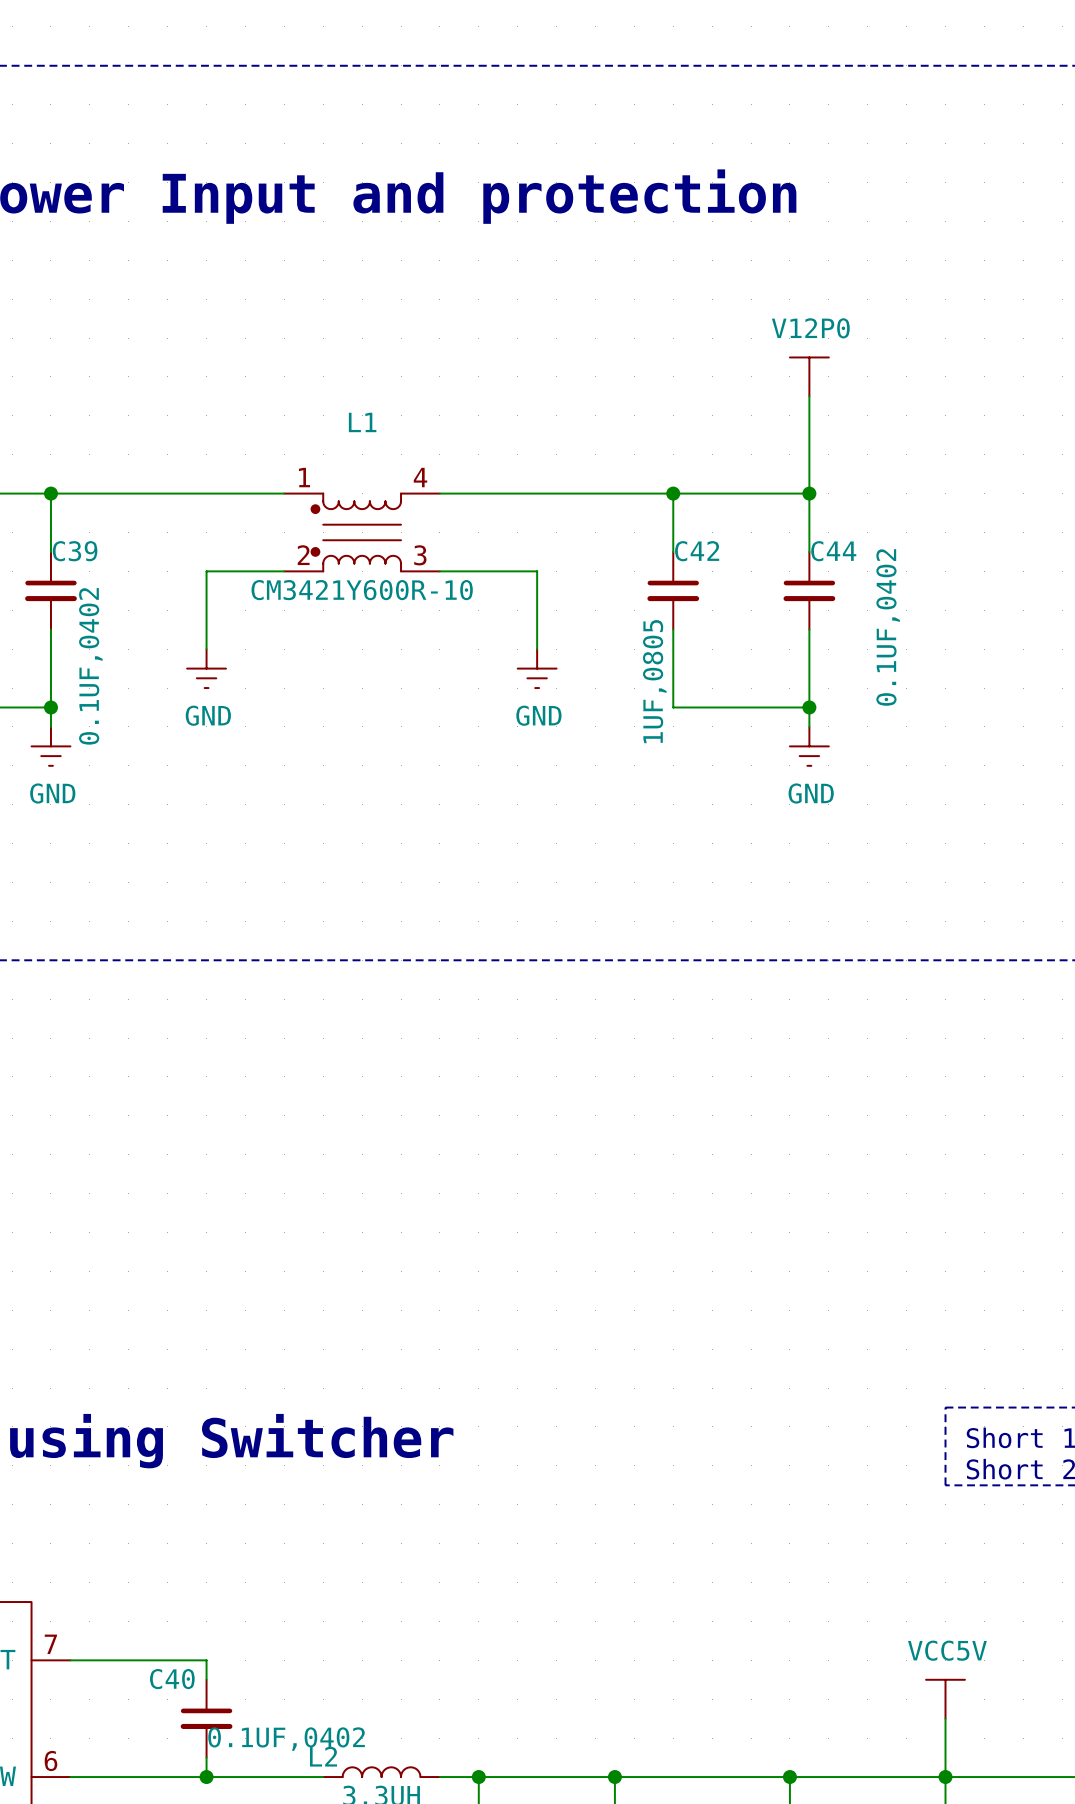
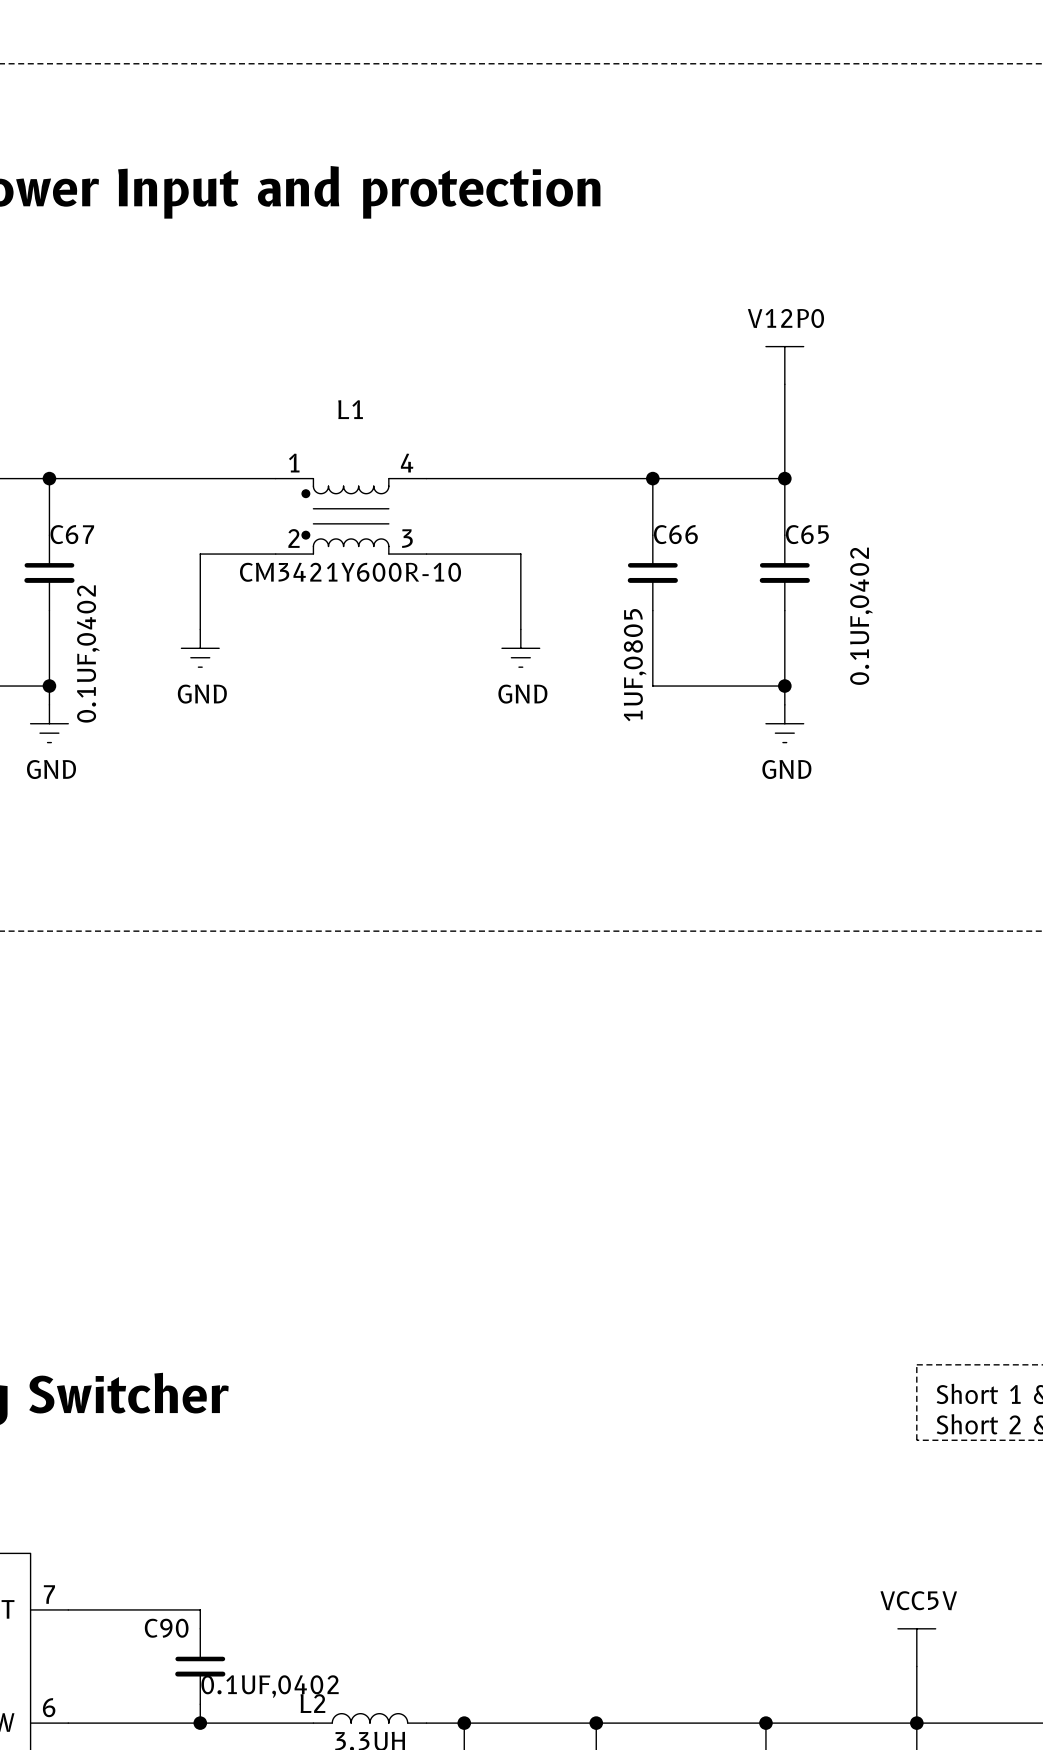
C39 name: C39 (75, 551) -> C67 (72, 534)
C42 name: C42 (697, 551) -> C66 (675, 534)
C44 name: C44 (833, 551) -> C65 (807, 534)
C40 name: C40 (172, 1679) -> C90 (166, 1628)

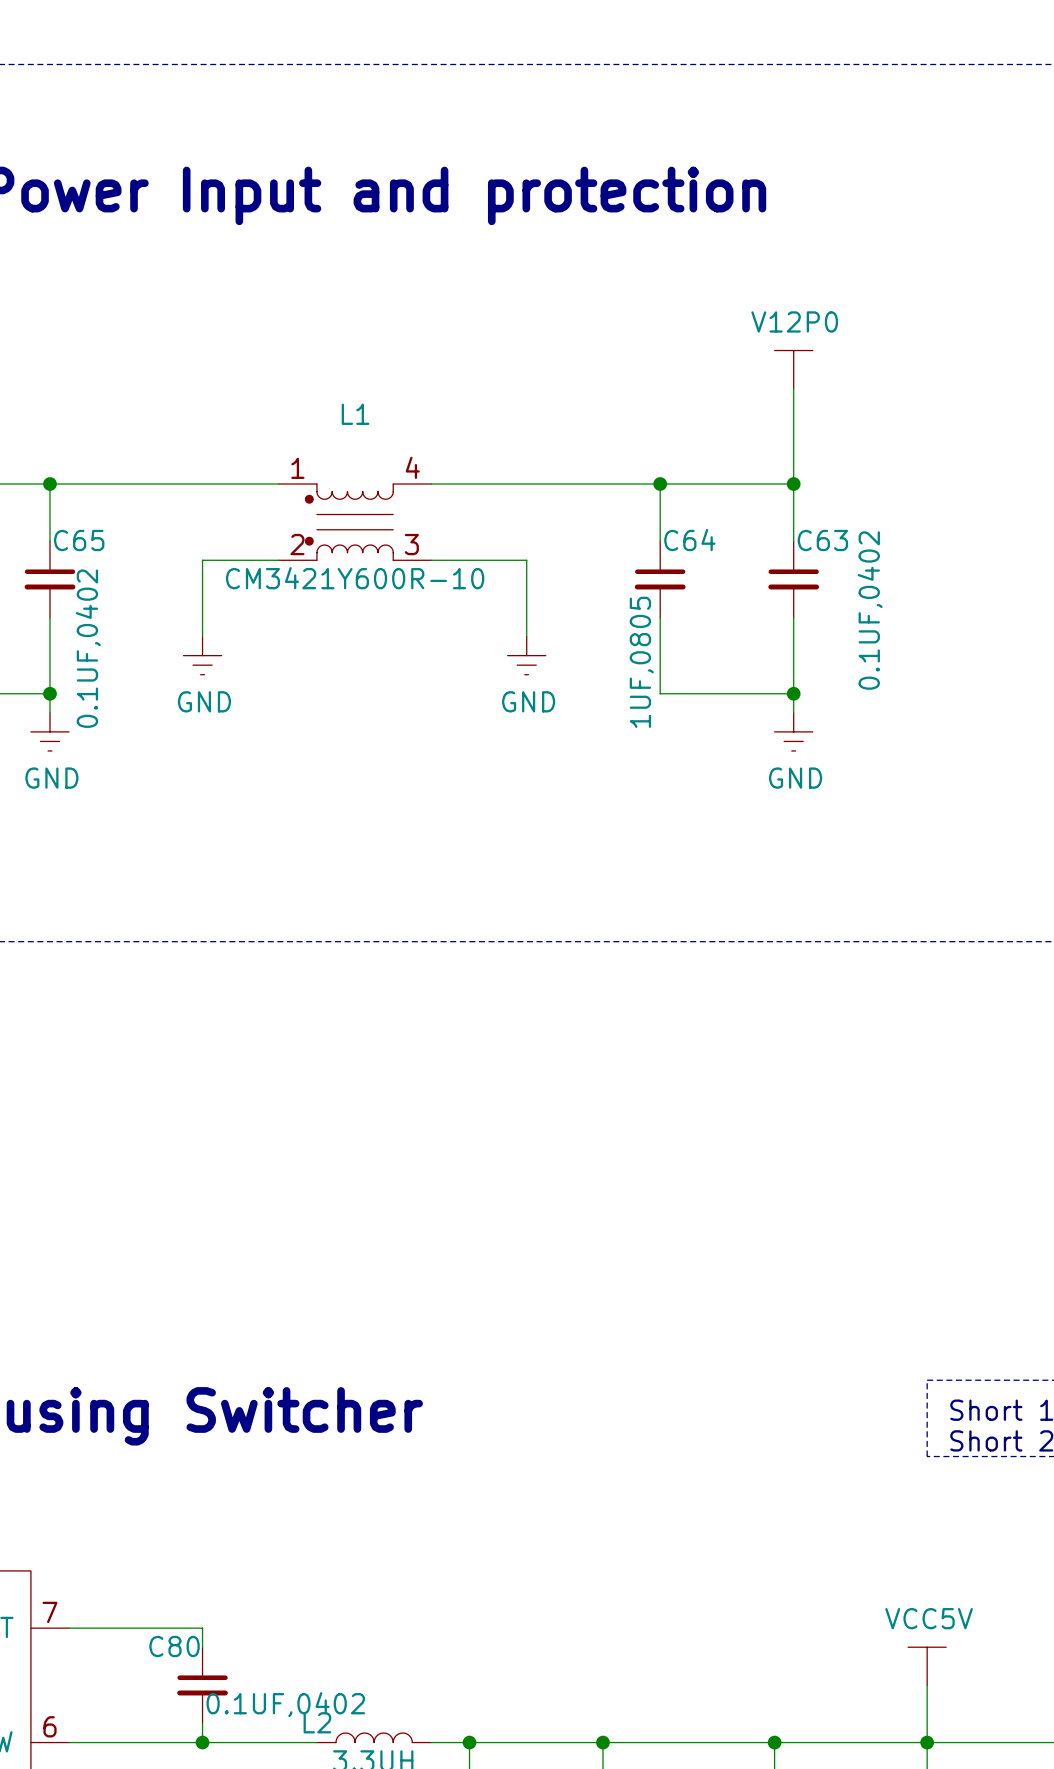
C67 name: C67 (72, 534) -> C65 (79, 540)
C66 name: C66 (675, 534) -> C64 (689, 540)
C65 name: C65 (807, 534) -> C63 (822, 540)
C90 name: C90 (166, 1628) -> C80 (174, 1646)

